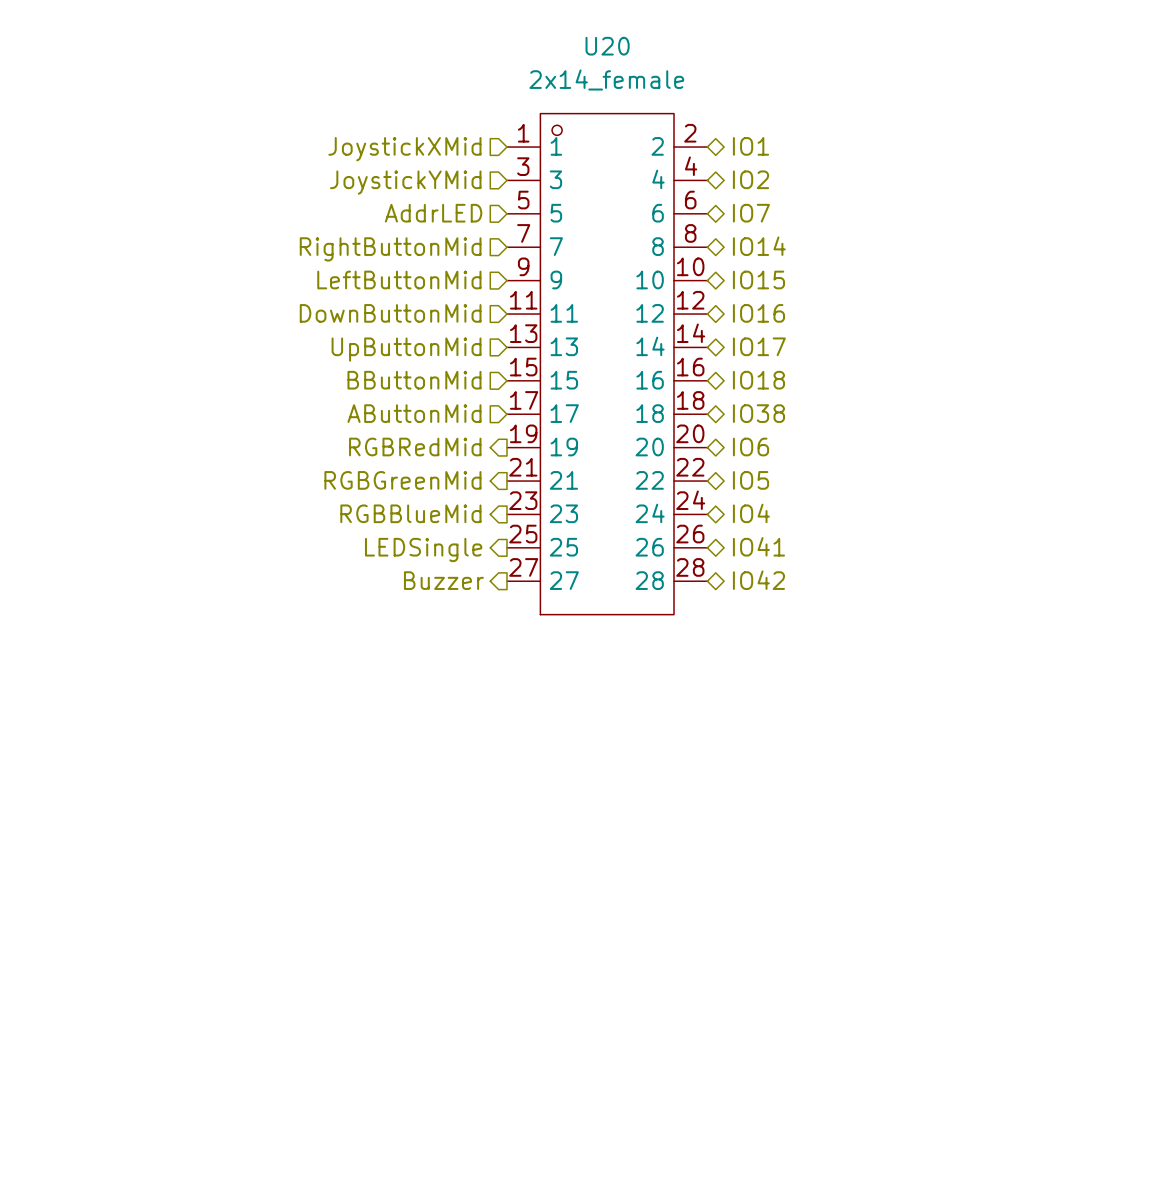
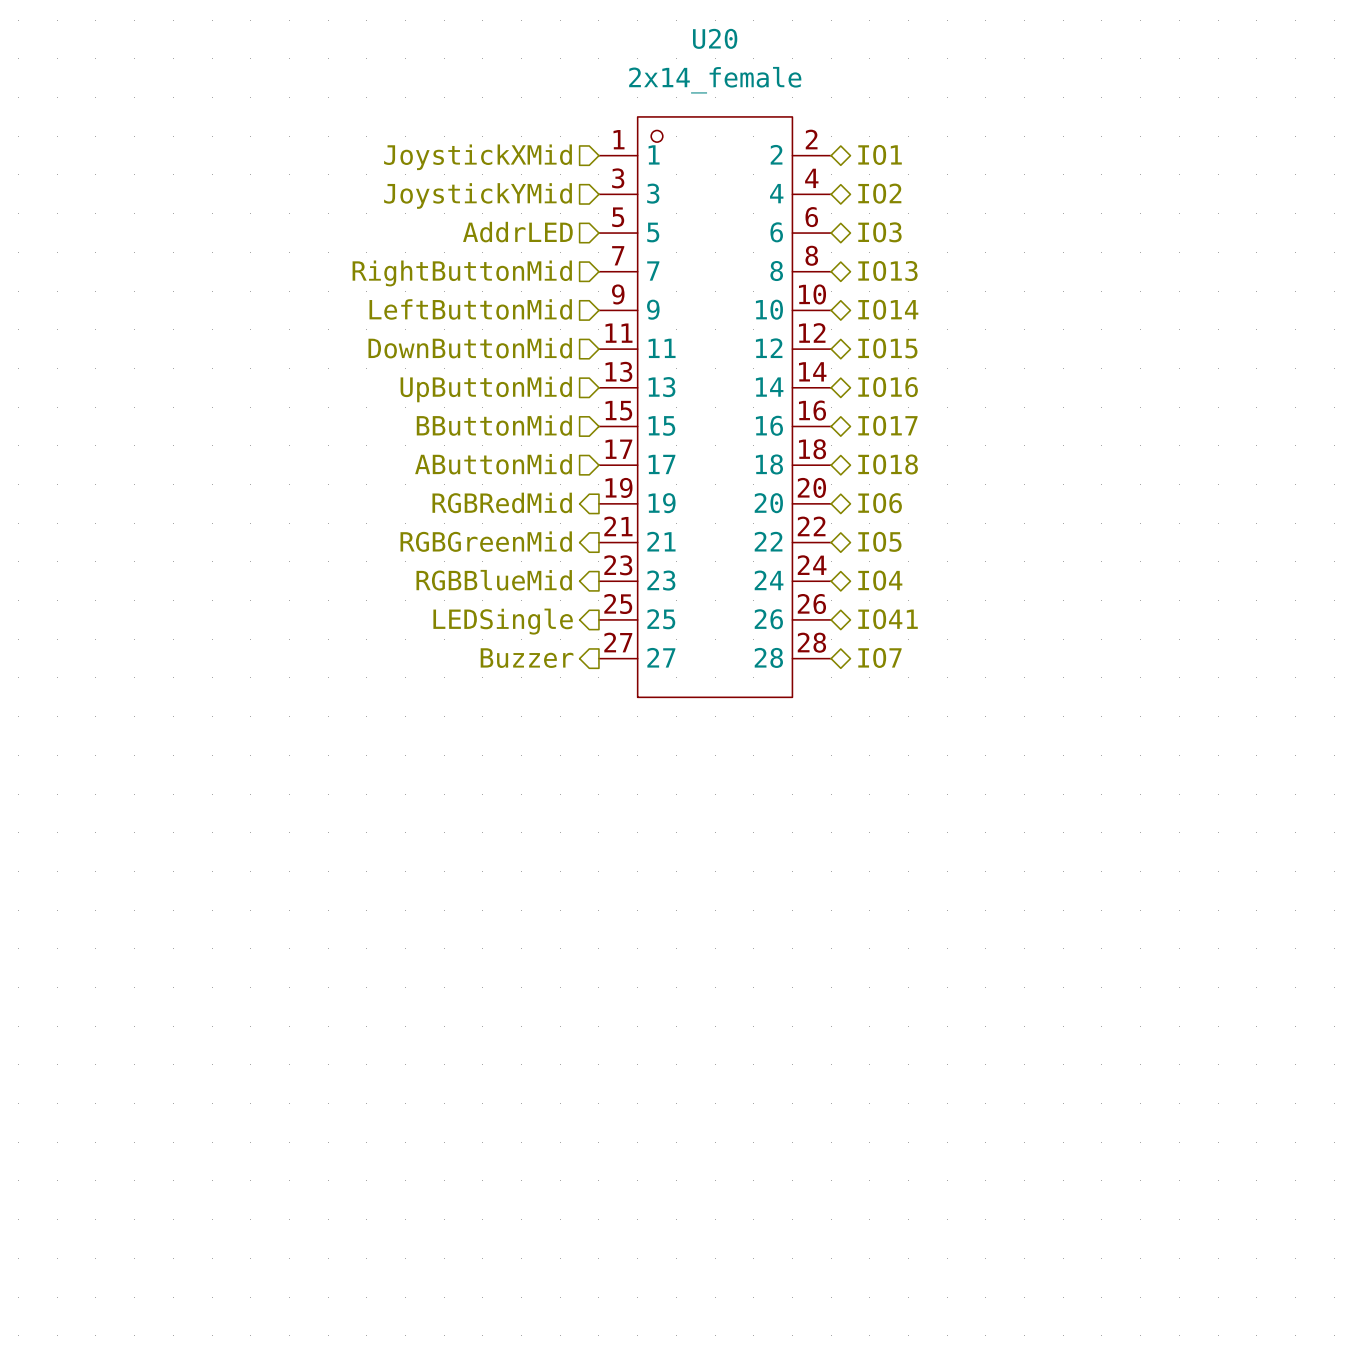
hierarchical label: IO7 (751, 213) -> IO3 (879, 232)
hierarchical label: IO14 (759, 246) -> IO13 (887, 271)
hierarchical label: IO15 (758, 280) -> IO14 (888, 309)
hierarchical label: IO16 (758, 313) -> IO15 (887, 348)
hierarchical label: IO17 (759, 346) -> IO16 (888, 387)
hierarchical label: IO18 (758, 380) -> IO17 (887, 425)
hierarchical label: IO38 (758, 413) -> IO18 (888, 464)
hierarchical label: IO42 (758, 580) -> IO7 (879, 657)

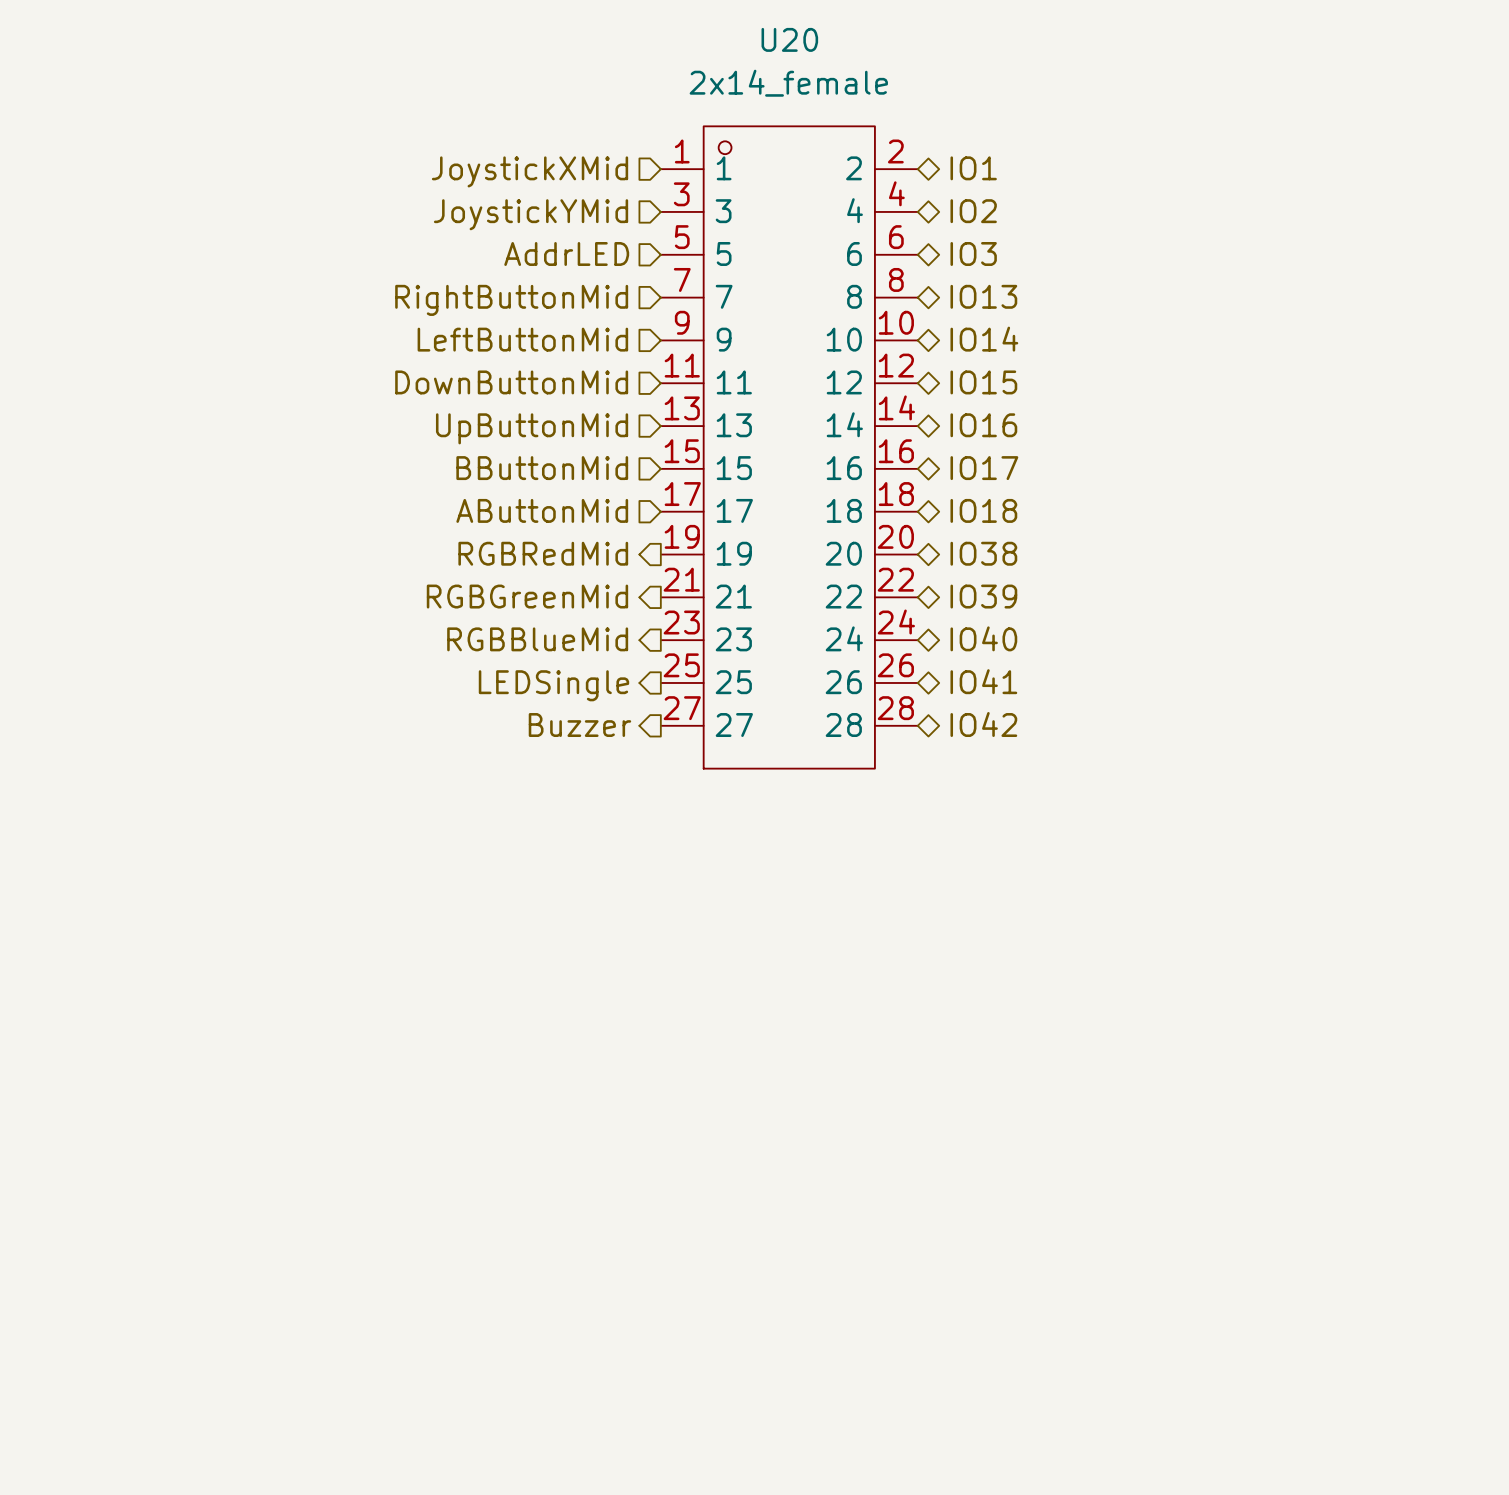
hierarchical label: IO6 (880, 503) -> IO38 (983, 553)
hierarchical label: IO5 (879, 541) -> IO39 (983, 596)
hierarchical label: IO4 (880, 580) -> IO40 (983, 638)
hierarchical label: IO7 (879, 657) -> IO42 (983, 724)

